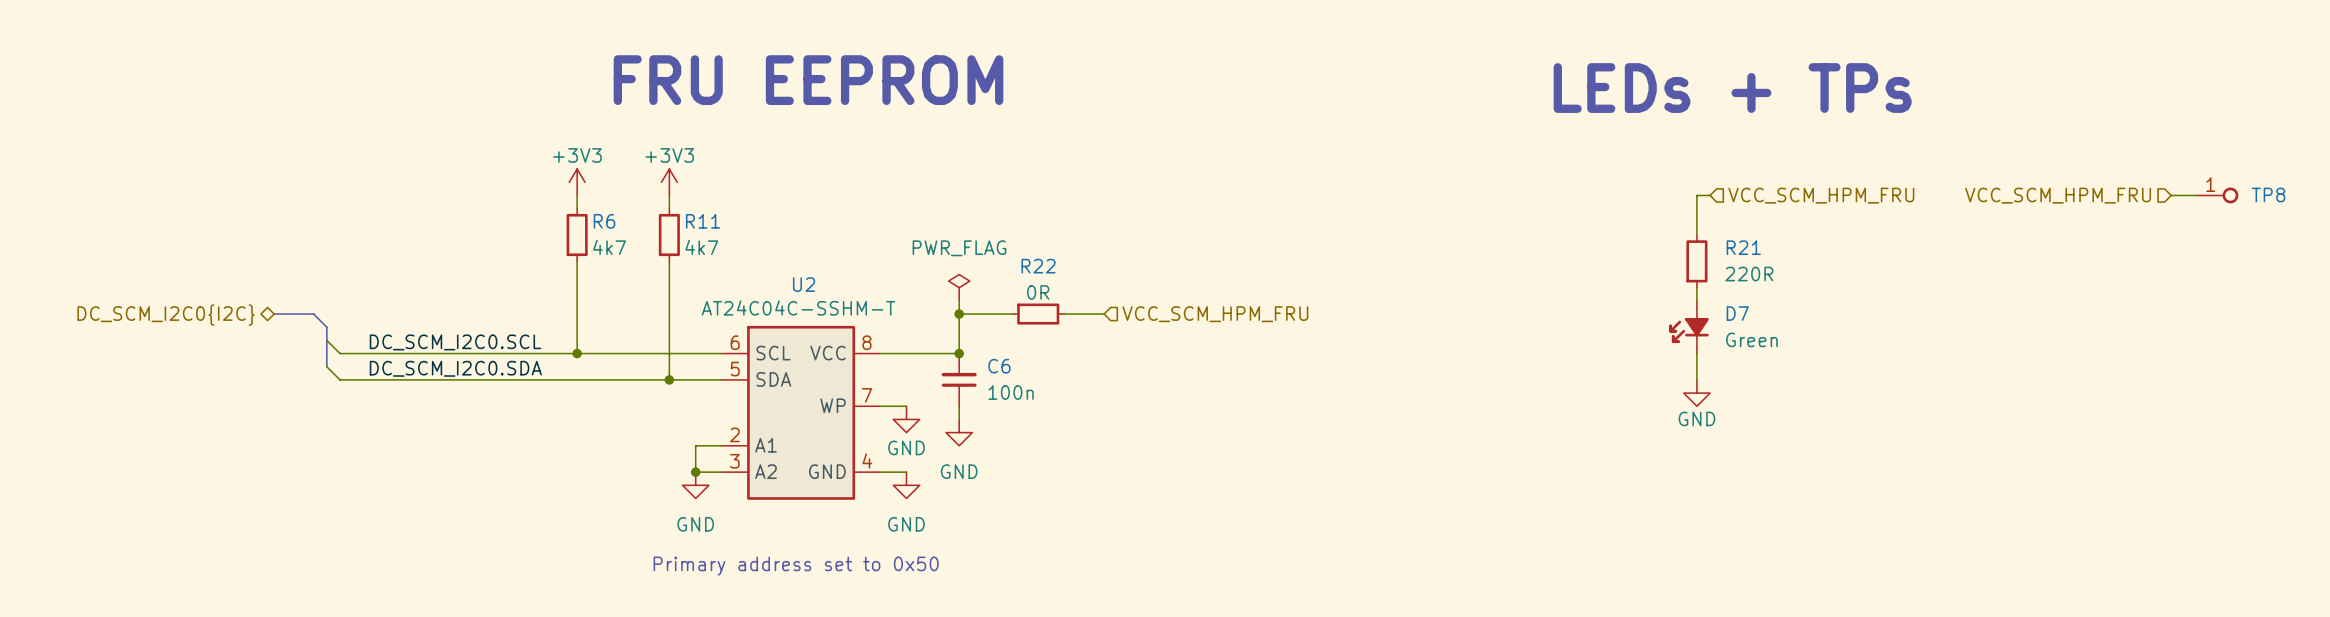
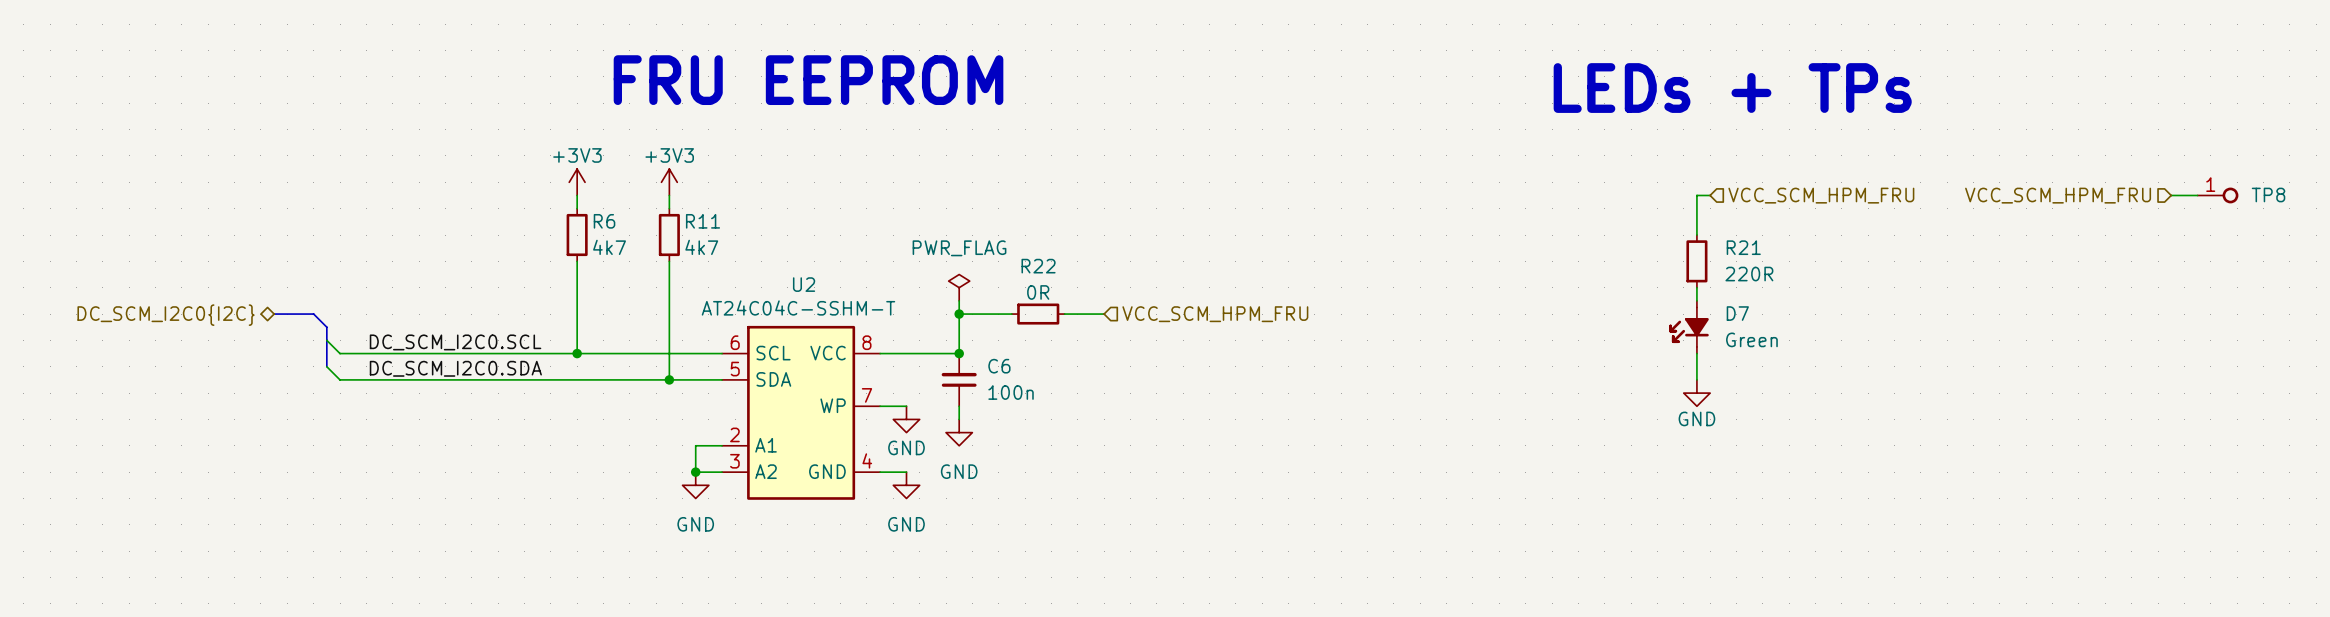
text: Primary address set to 0x50 (796, 566) -> none

